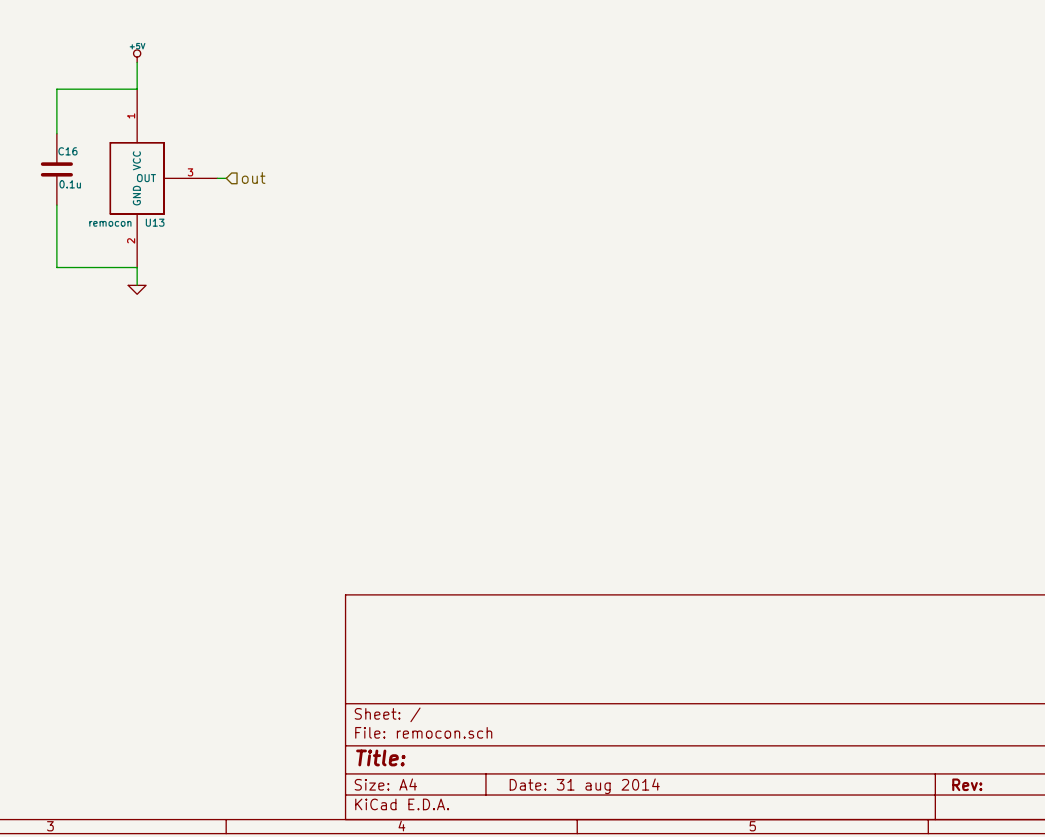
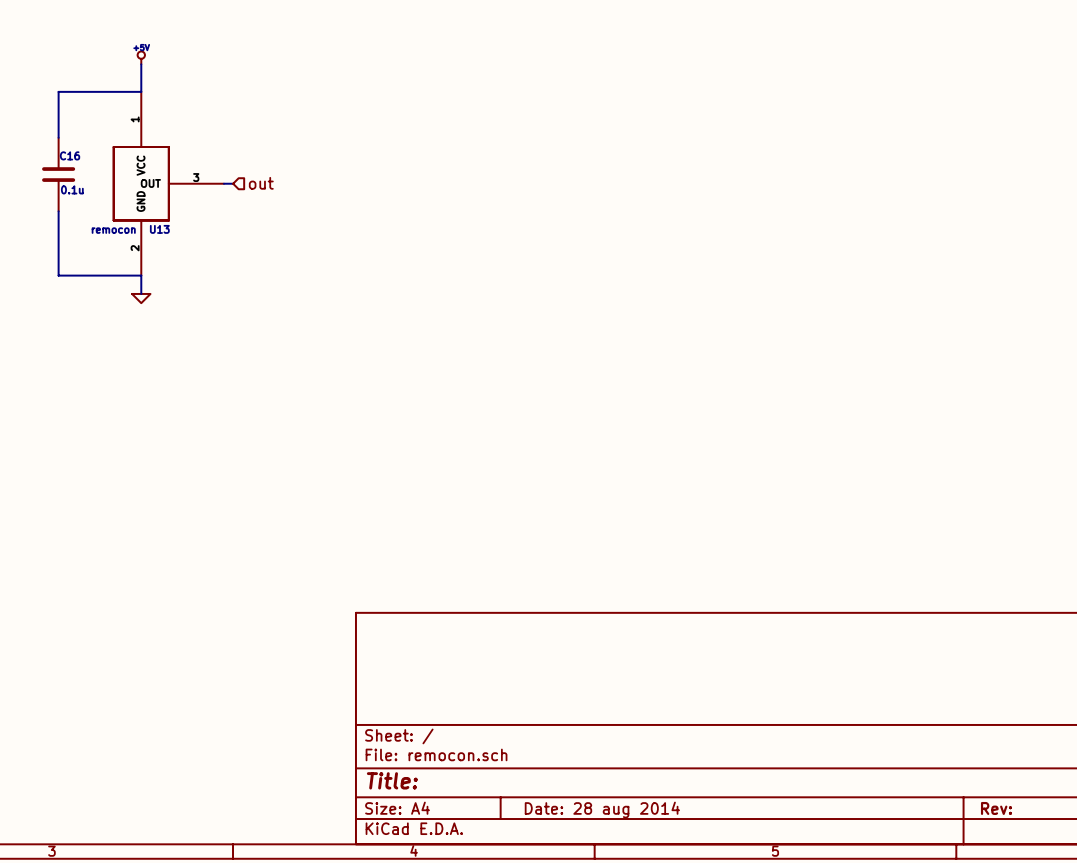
title block: Date: 31 aug 2014 (584, 786) -> Date: 28 aug 2014 (602, 810)

